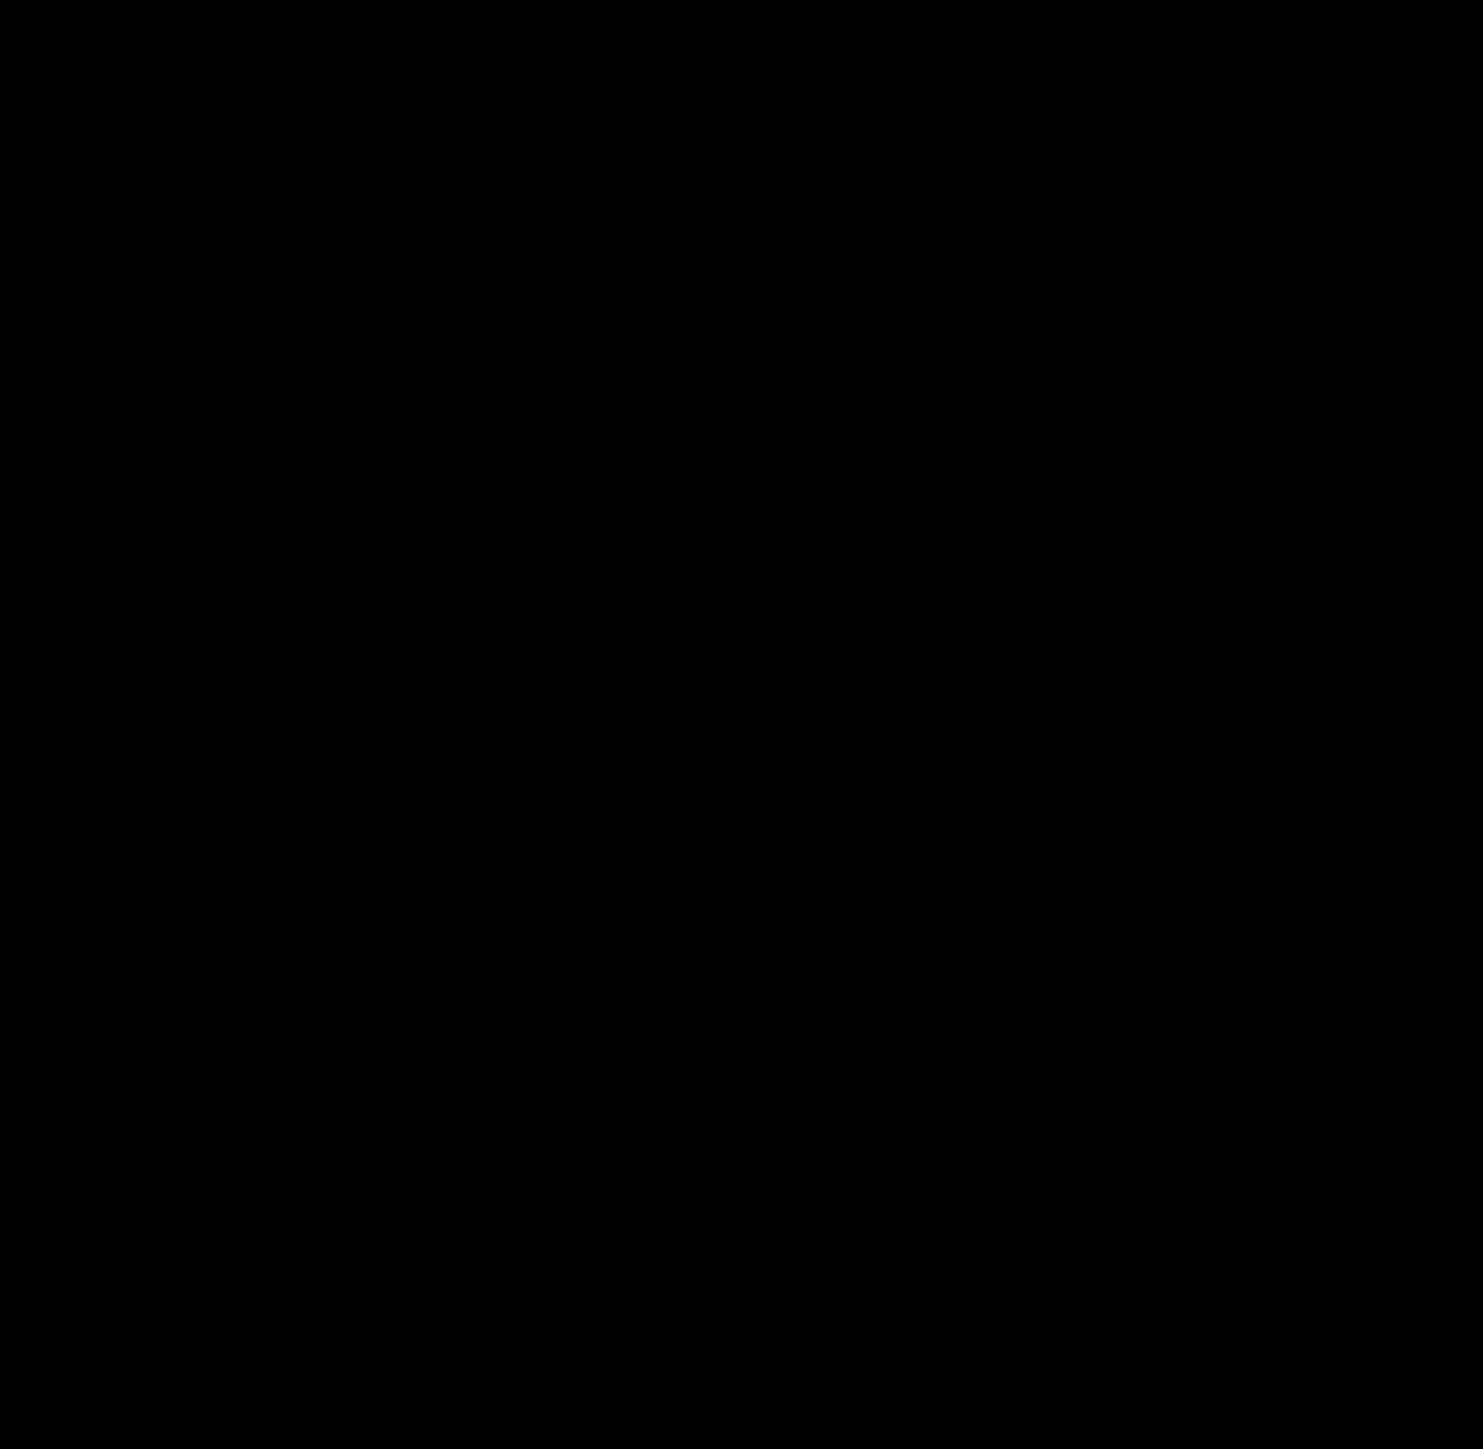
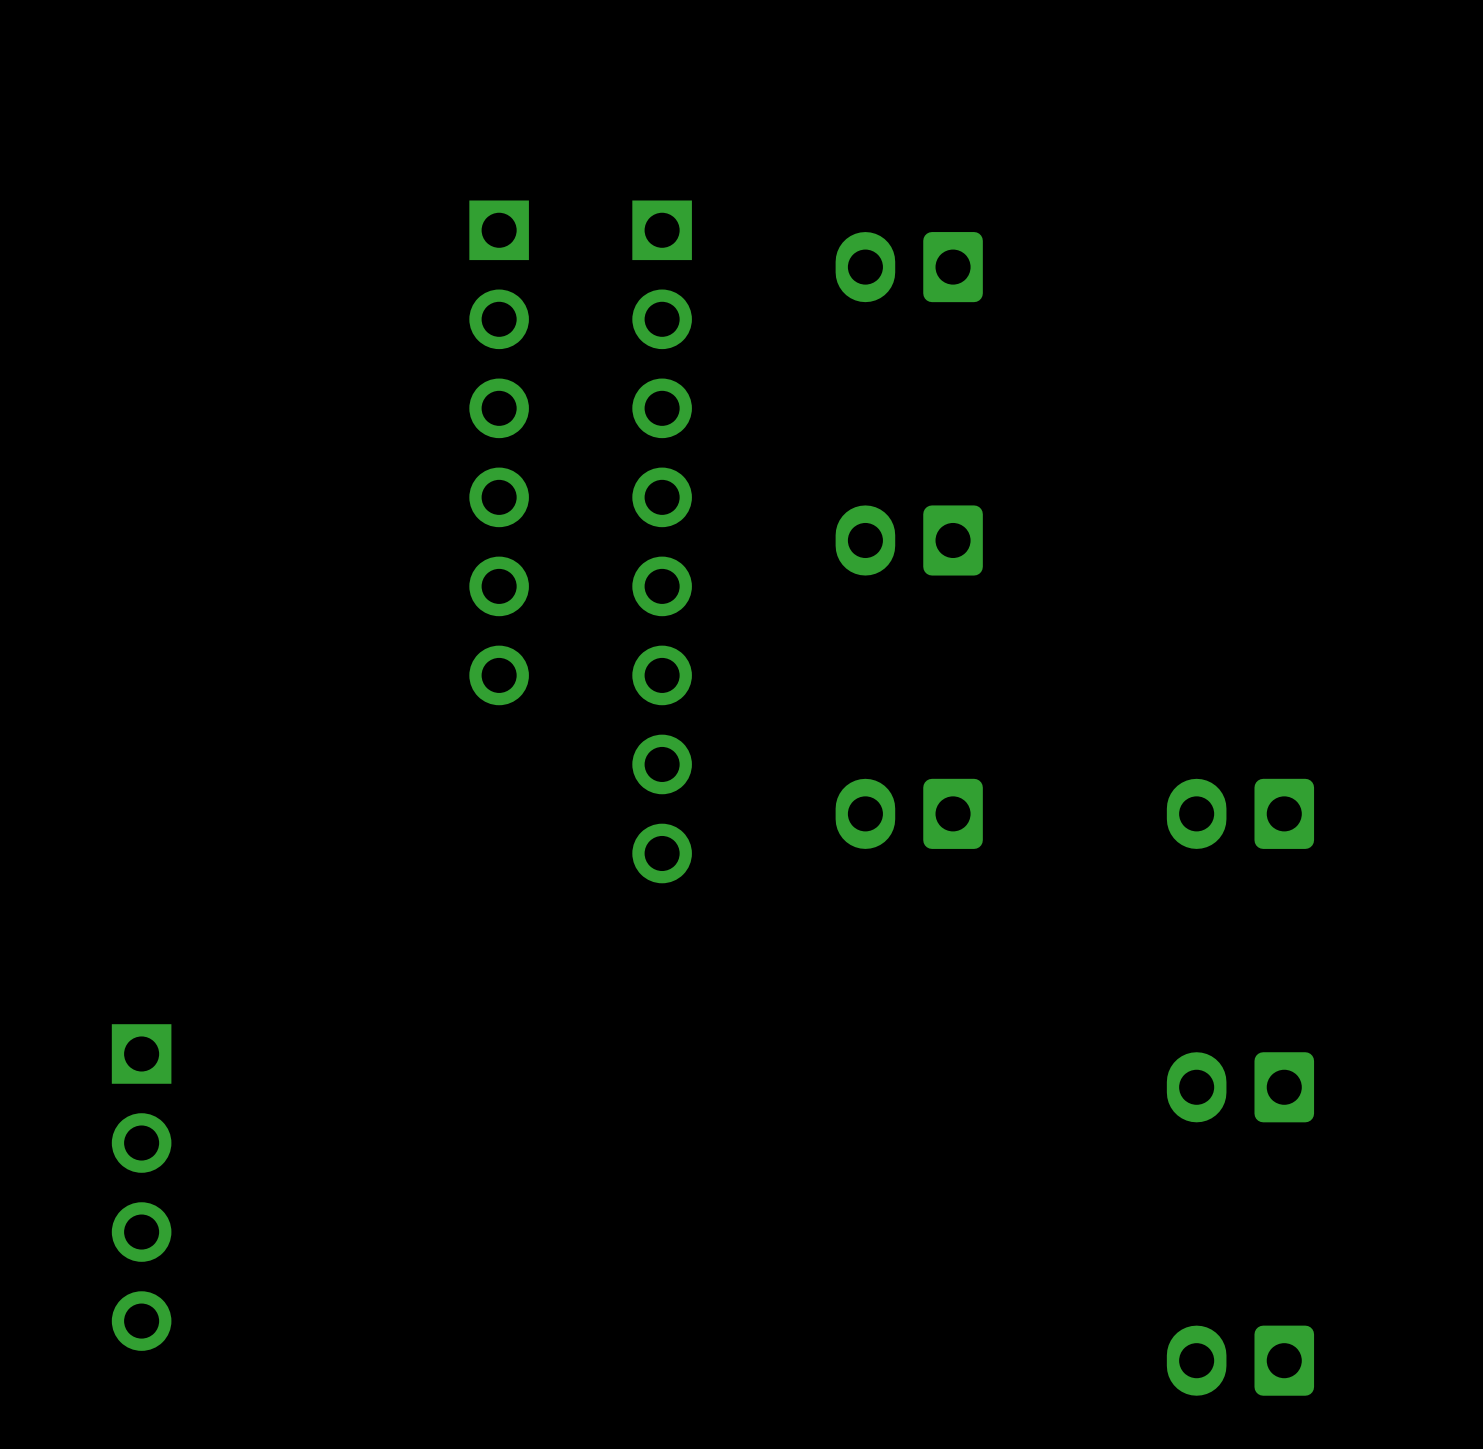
part: none -> (909, 267)
part: none -> (499, 452)
part: none -> (909, 540)
part: none -> (662, 541)
part: none -> (909, 813)
part: none -> (1240, 813)
part: none -> (1240, 1087)
part: none -> (141, 1187)
part: none -> (1240, 1360)

